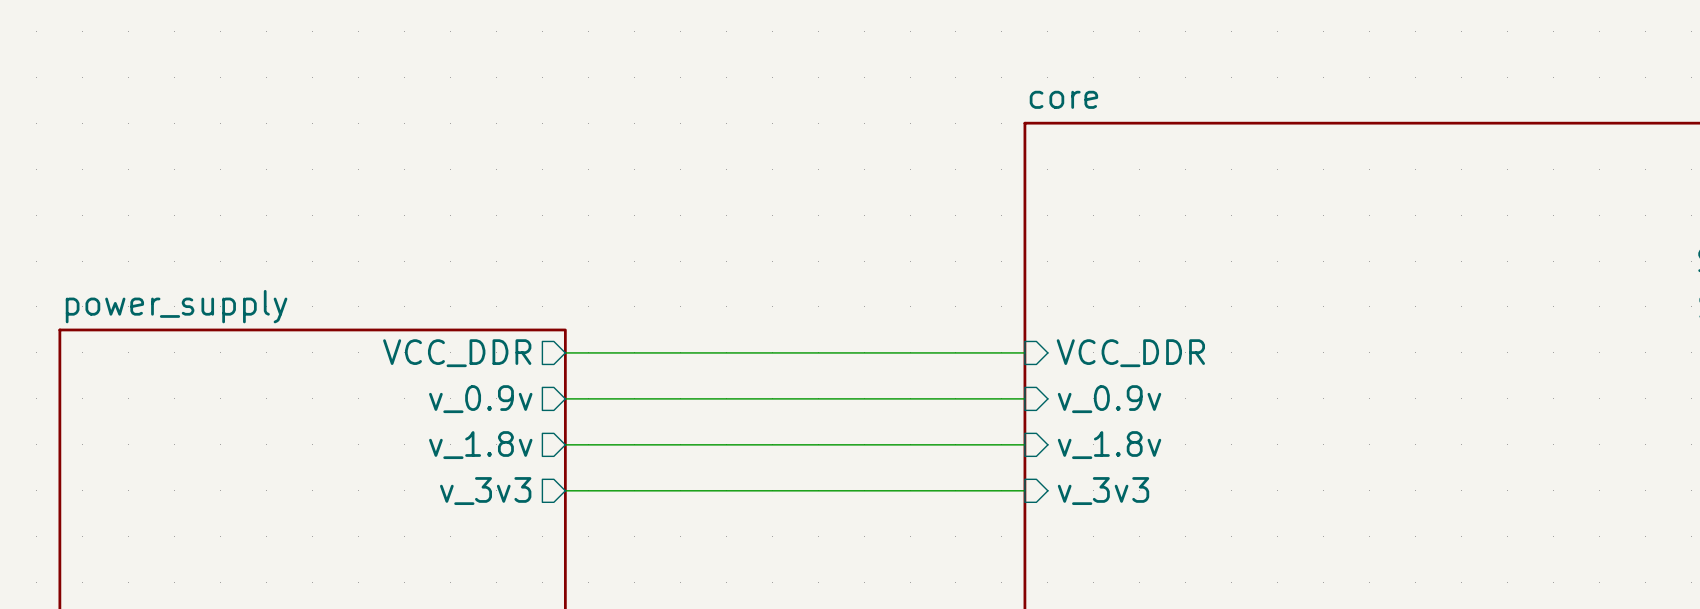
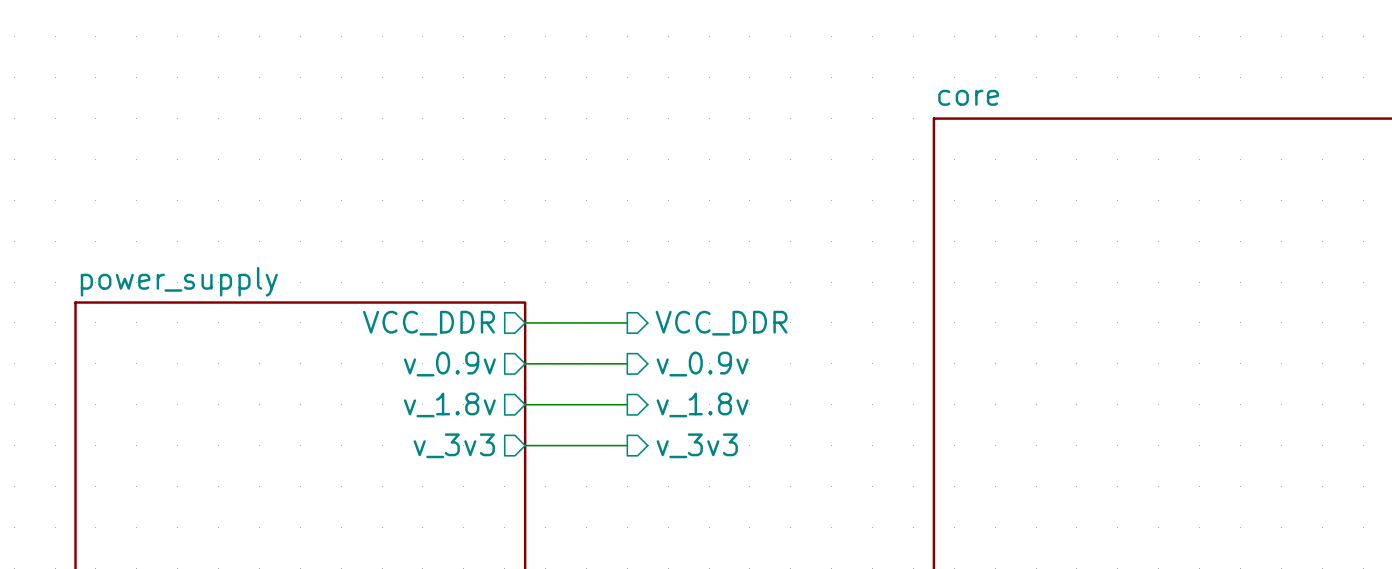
wire: (680, 352) (1024, 352) -> none
sheet pin position: VCC_DDR (1130, 353) -> VCC_DDR (721, 323)
wire: (680, 398) (1024, 398) -> none
sheet pin position: v_0.9v (1109, 399) -> v_0.9v (702, 364)
wire: (680, 444) (1024, 444) -> none
sheet pin position: v_1.8v (1109, 445) -> v_1.8v (702, 404)
wire: (680, 490) (1024, 490) -> none
sheet pin position: v_3v3 (1103, 491) -> v_3v3 (697, 445)

